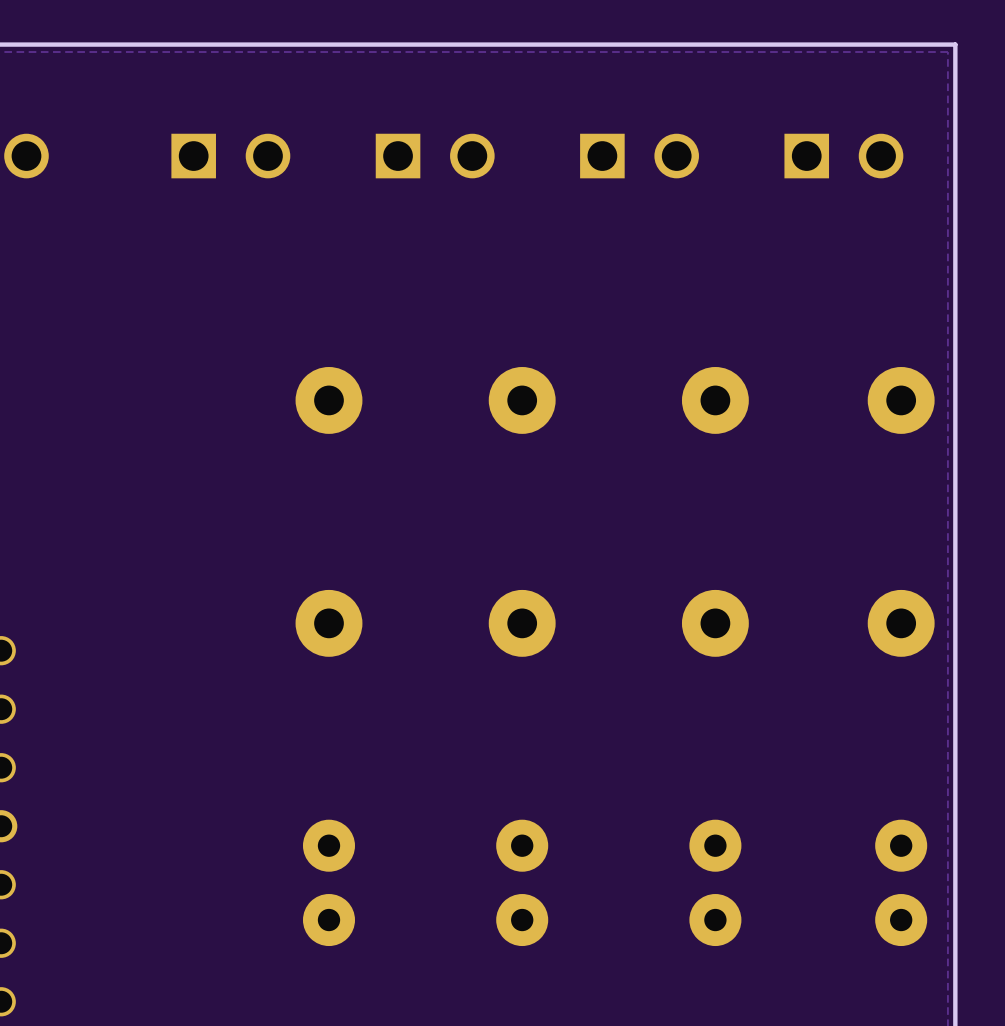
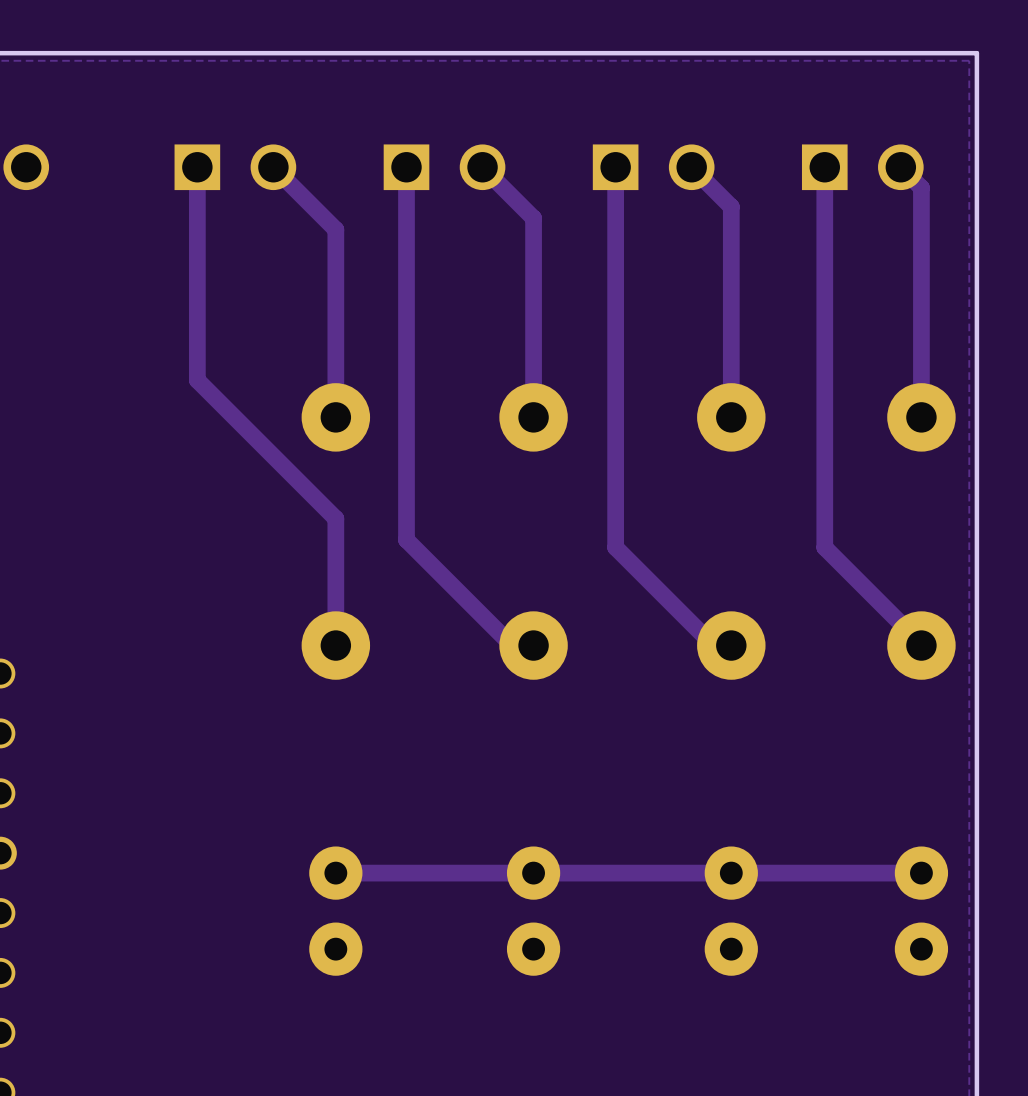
track: none -> (197, 167) (197, 380) (335, 518) (335, 645)
track: none -> (273, 167) (335, 229) (335, 417)
track: none -> (406, 167) (406, 539) (512, 645) (533, 645)
track: none -> (482, 167) (533, 218) (533, 417)
track: none -> (615, 167) (615, 547) (713, 645) (731, 645)
track: none -> (691, 167) (731, 206) (731, 417)
track: none -> (824, 167) (824, 547) (921, 645)
track: none -> (900, 167) (921, 187) (921, 417)
track: none -> (921, 873) (335, 873)

